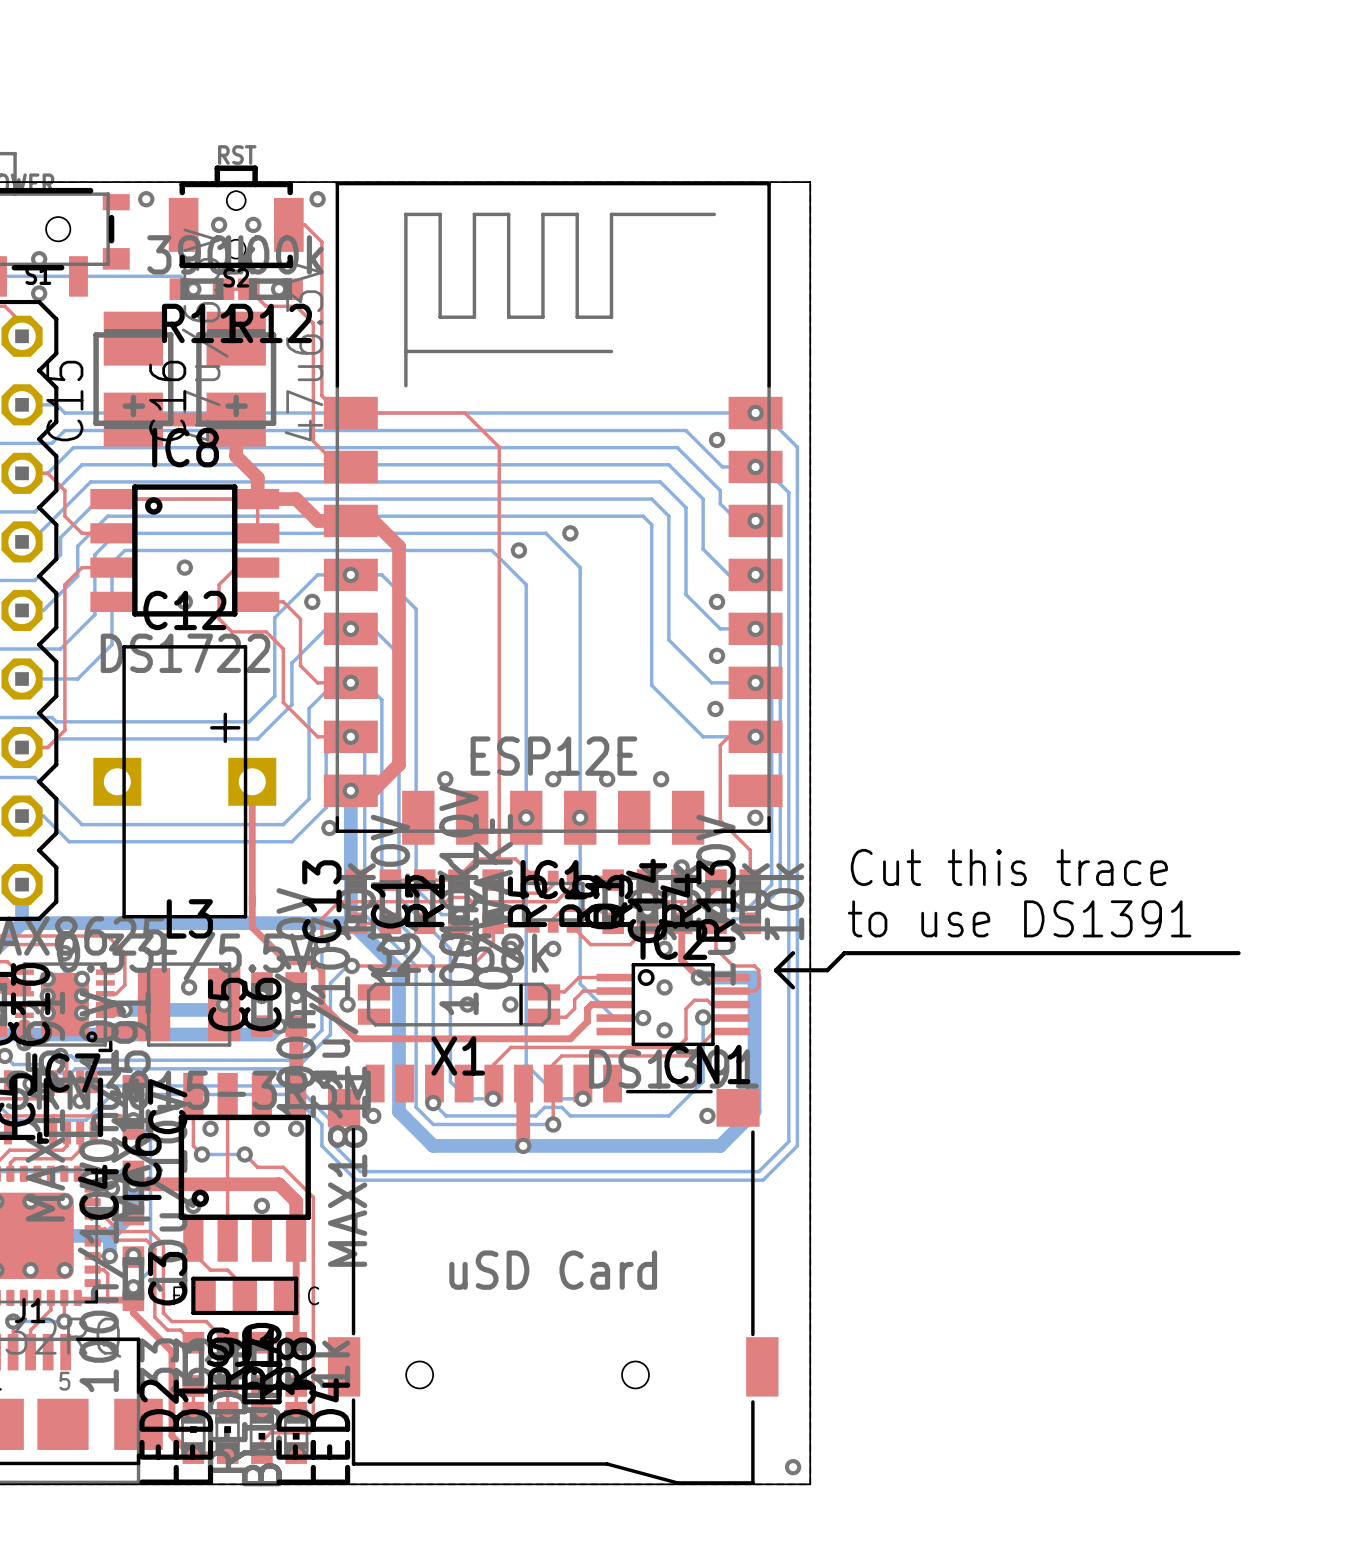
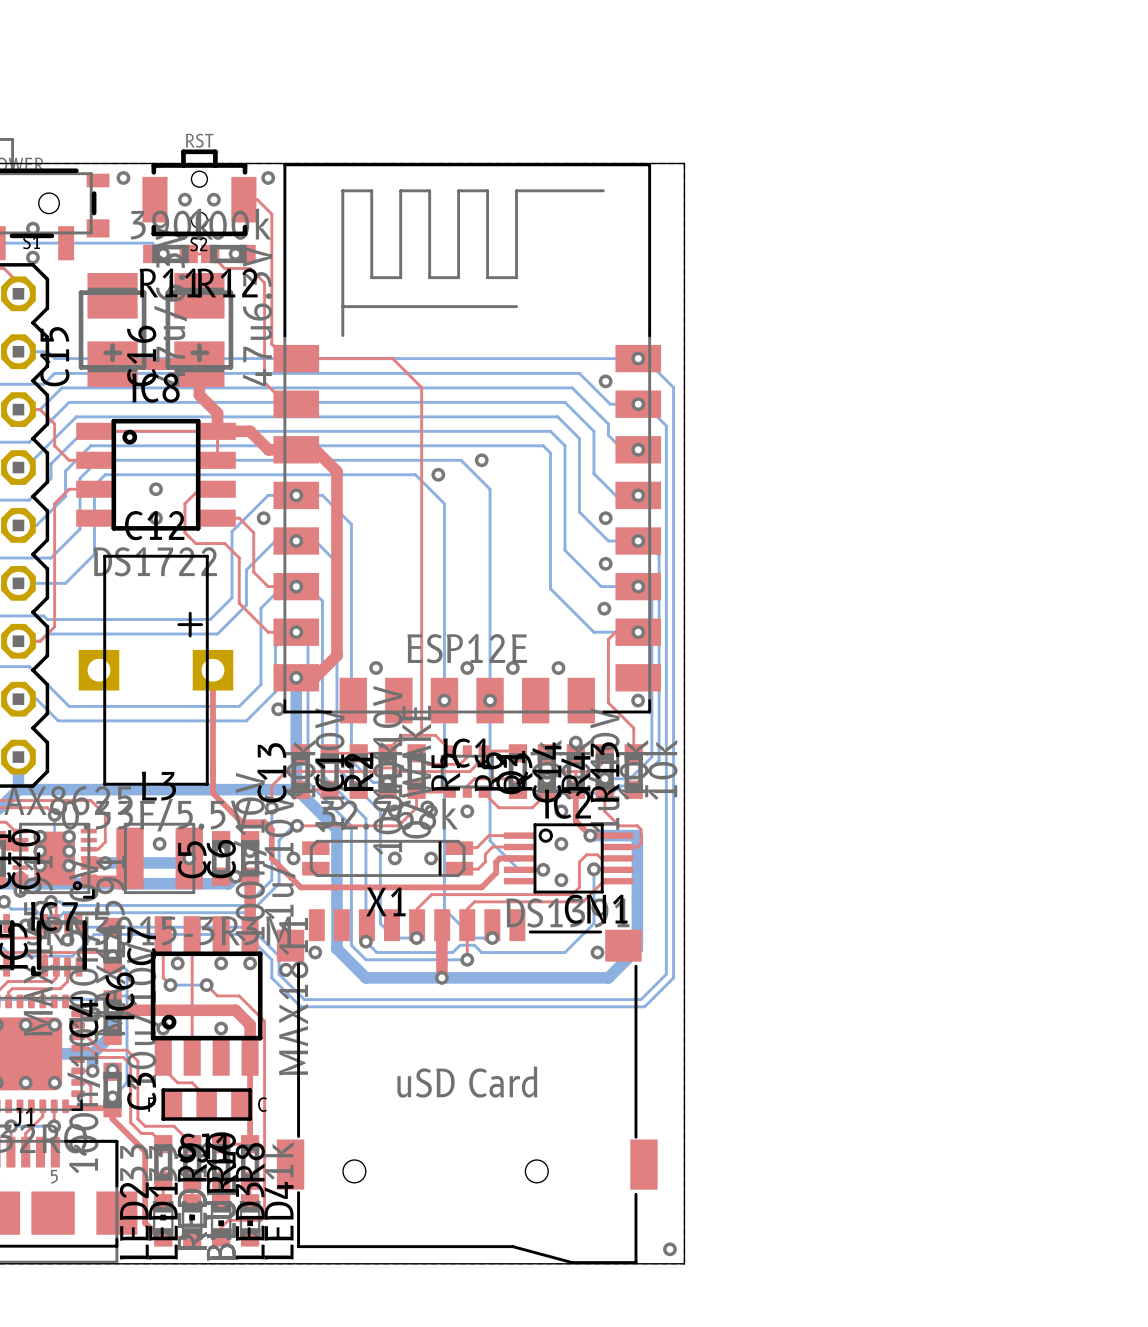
text: Cut this trace (1009, 867) -> none
text: to use DS1391 (1019, 918) -> none
line: (793, 953) (775, 970) -> none
line: (1238, 953) (844, 953) (827, 970) (775, 970) -> none
line: (775, 970) (793, 987) -> none

